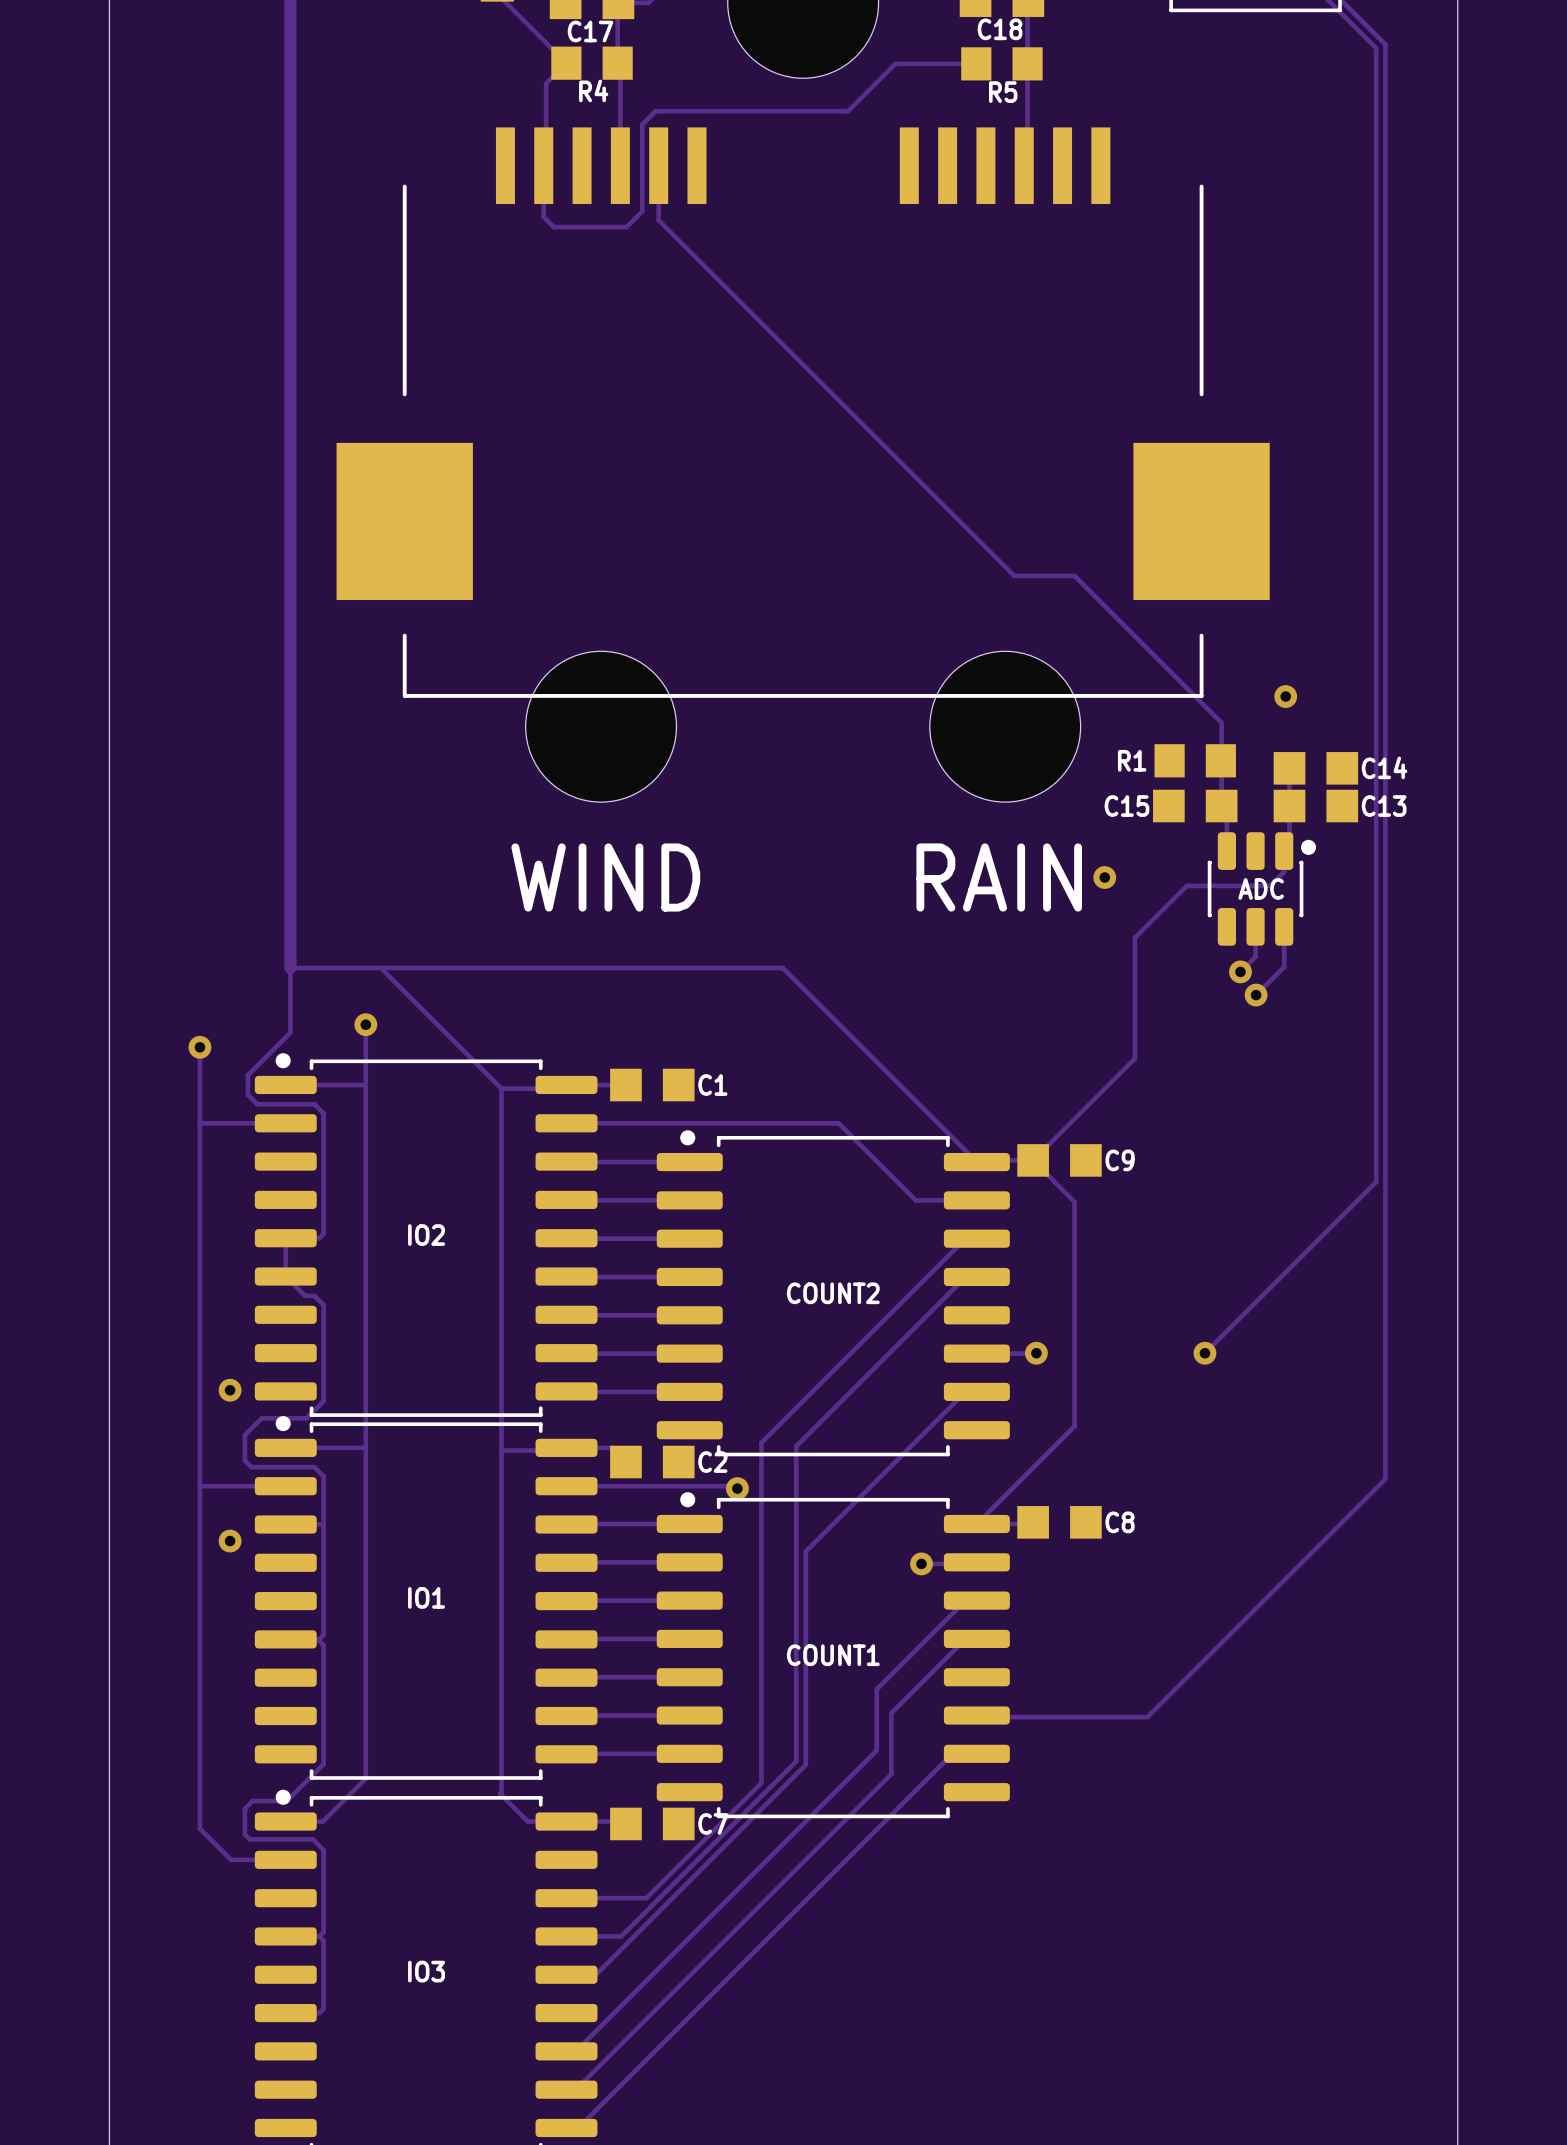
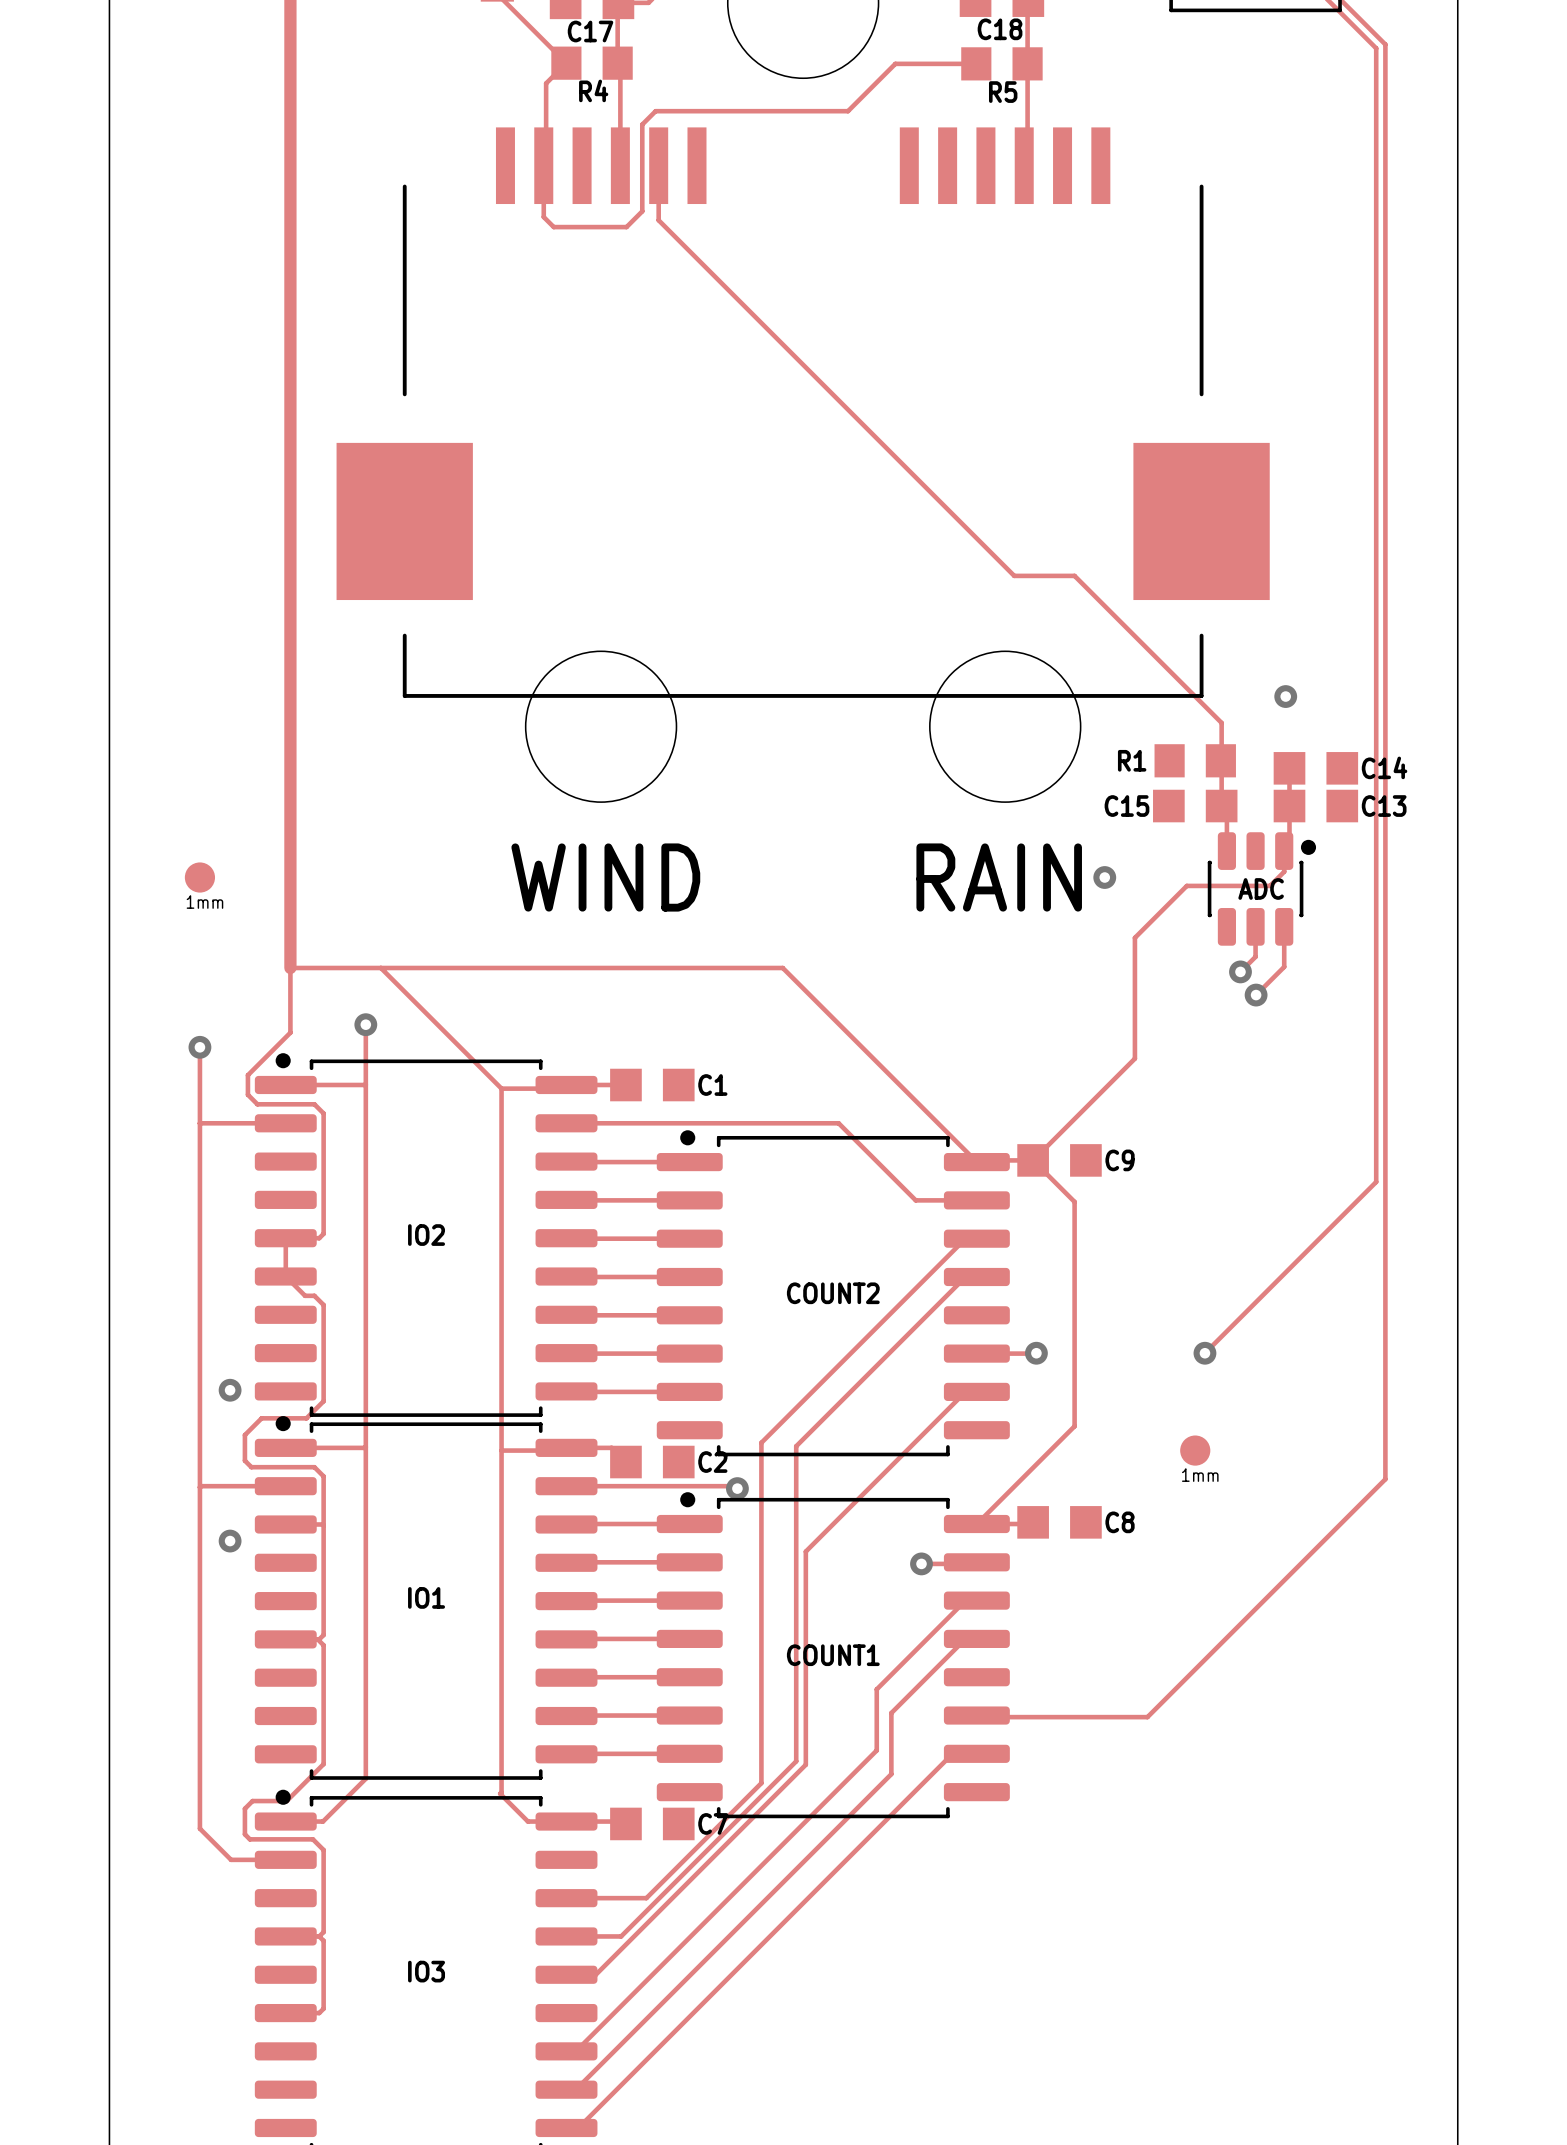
part: none -> (199, 877)
part: none -> (1195, 1450)

